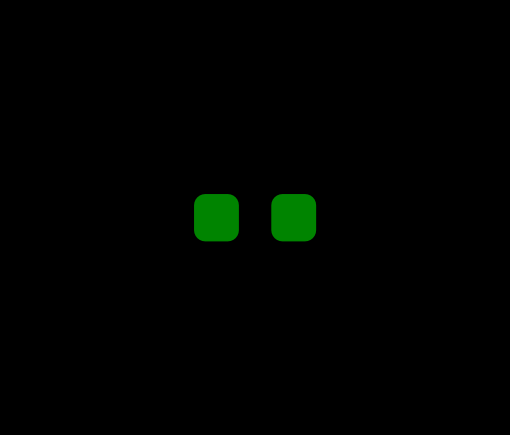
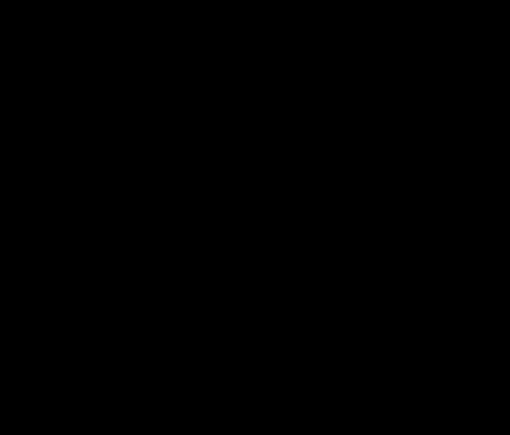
part: (255, 217) -> none

